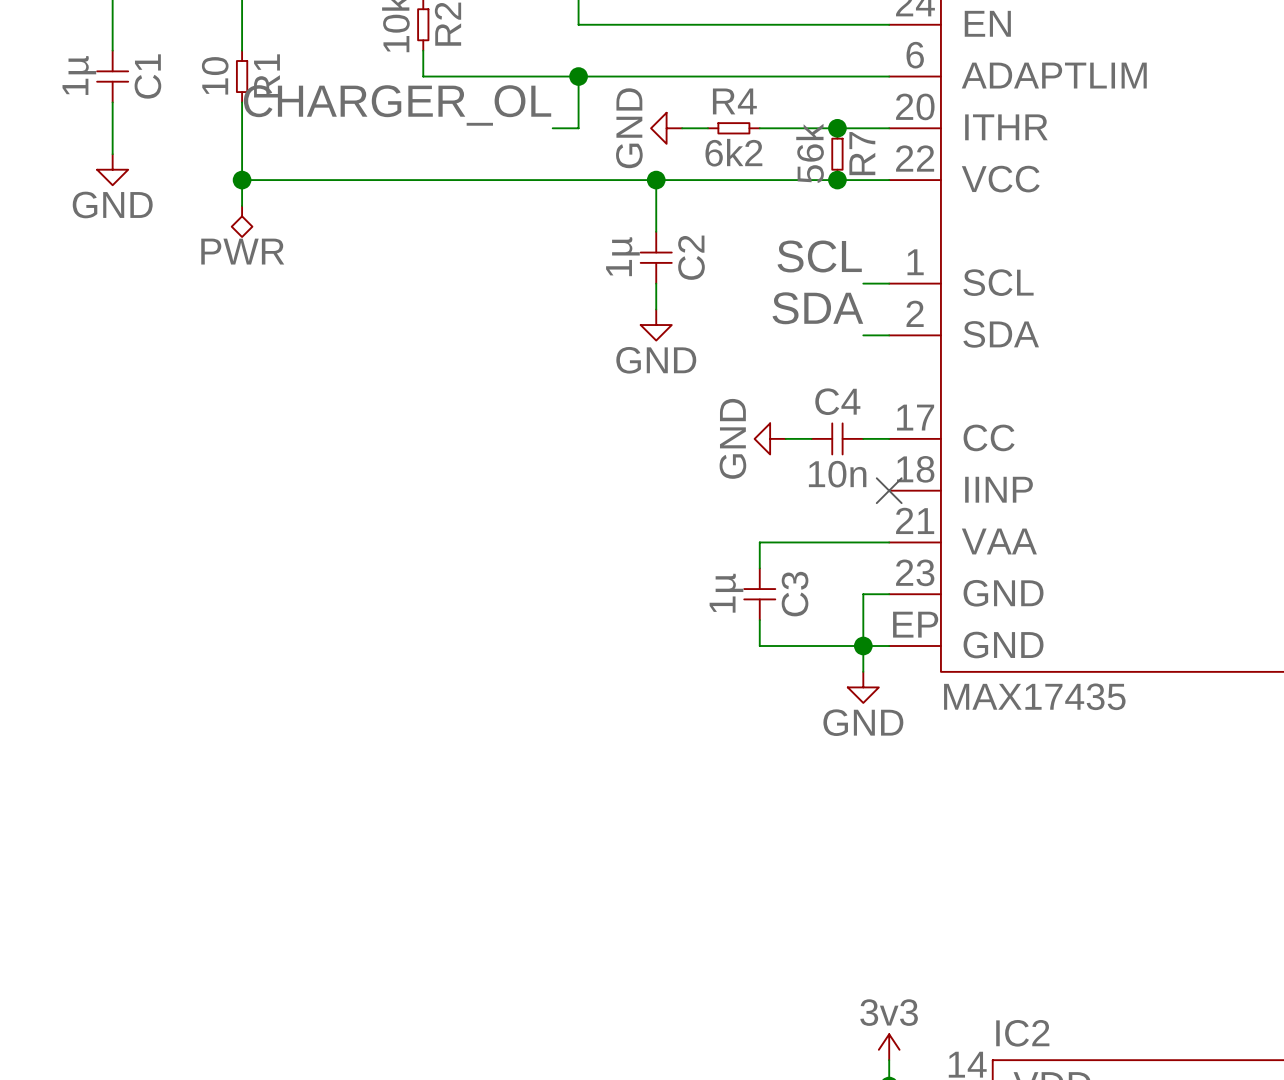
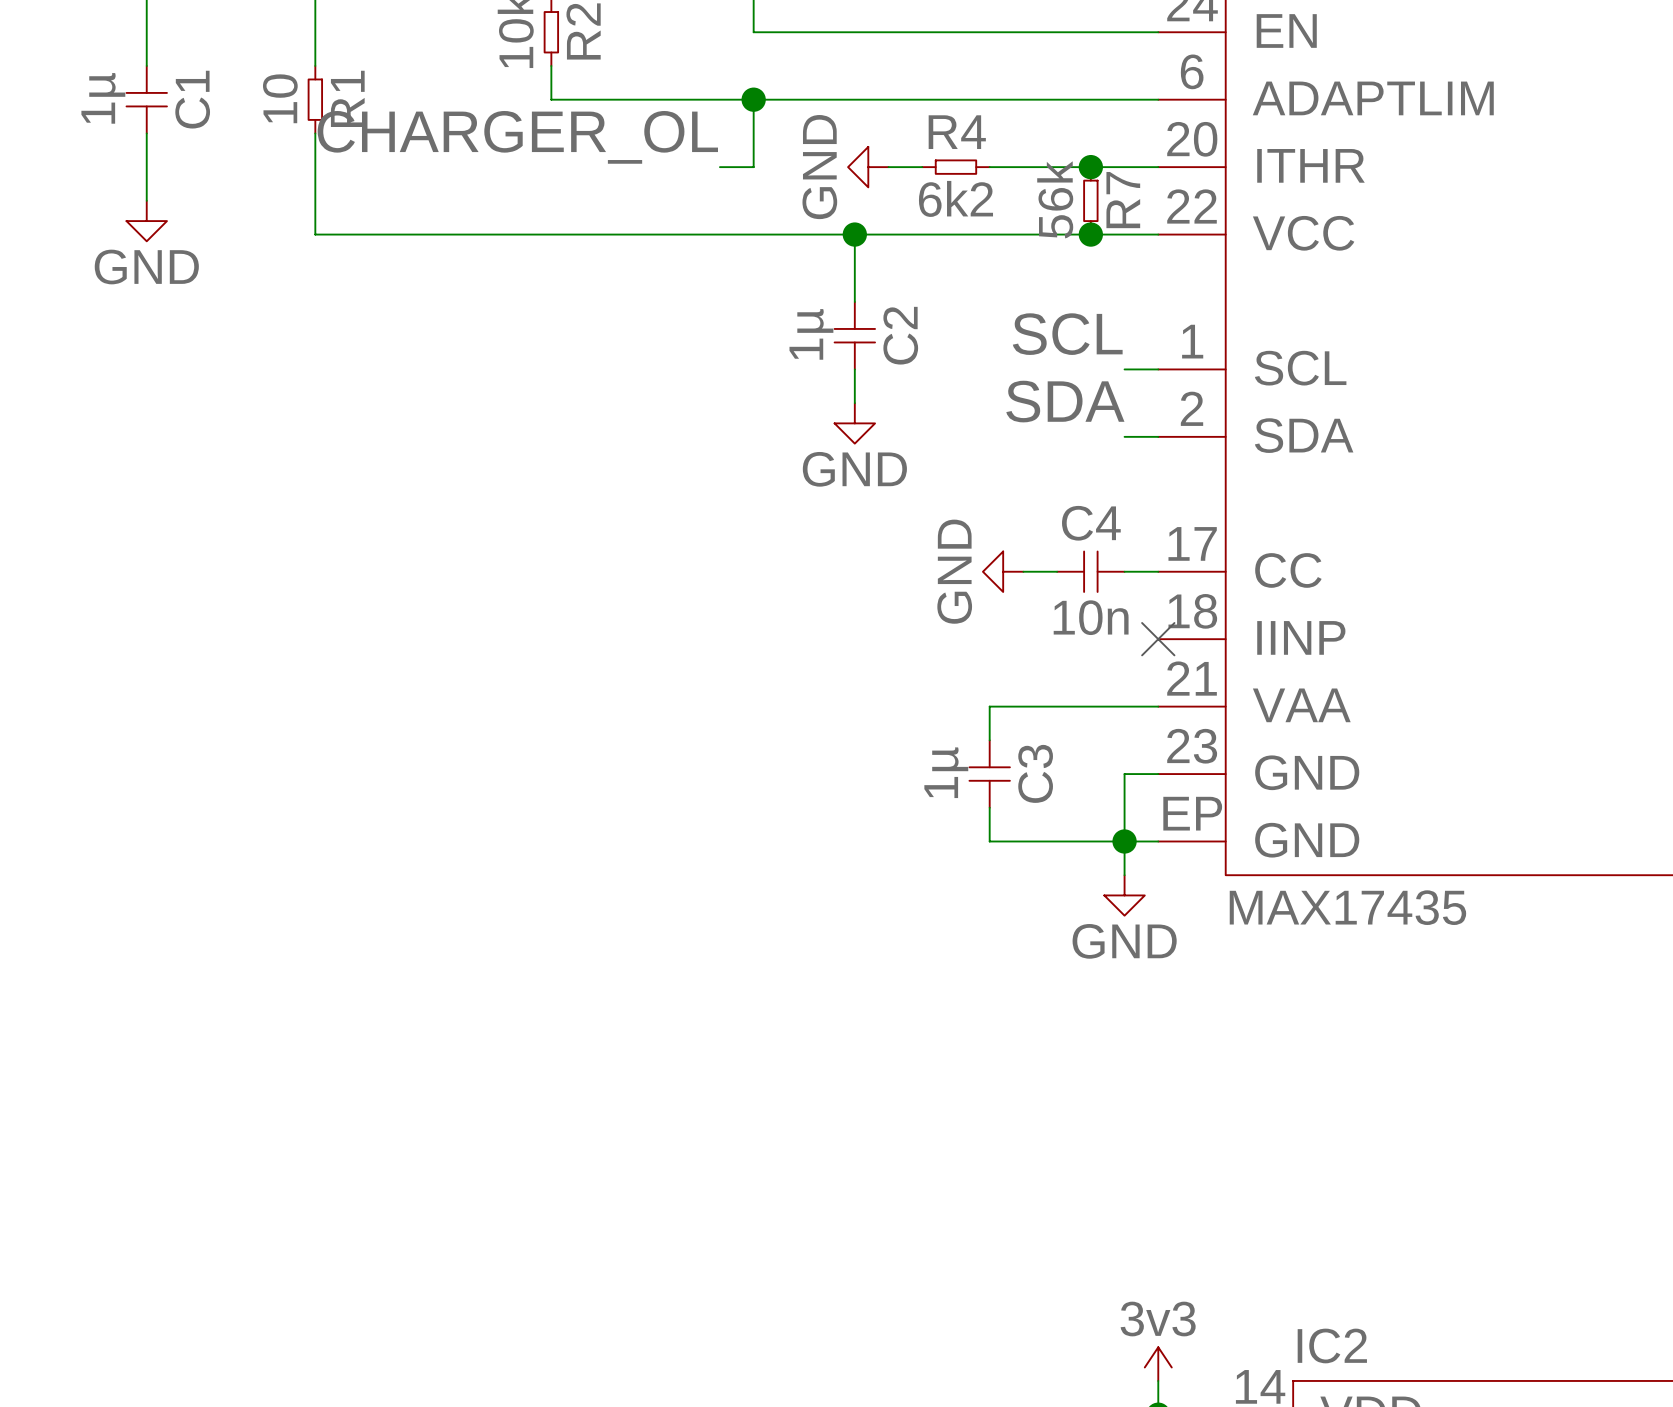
wire: (242, 180) (242, 205) -> none
junction: (242, 180) -> none
power symbol: PWR (242, 221) -> none

